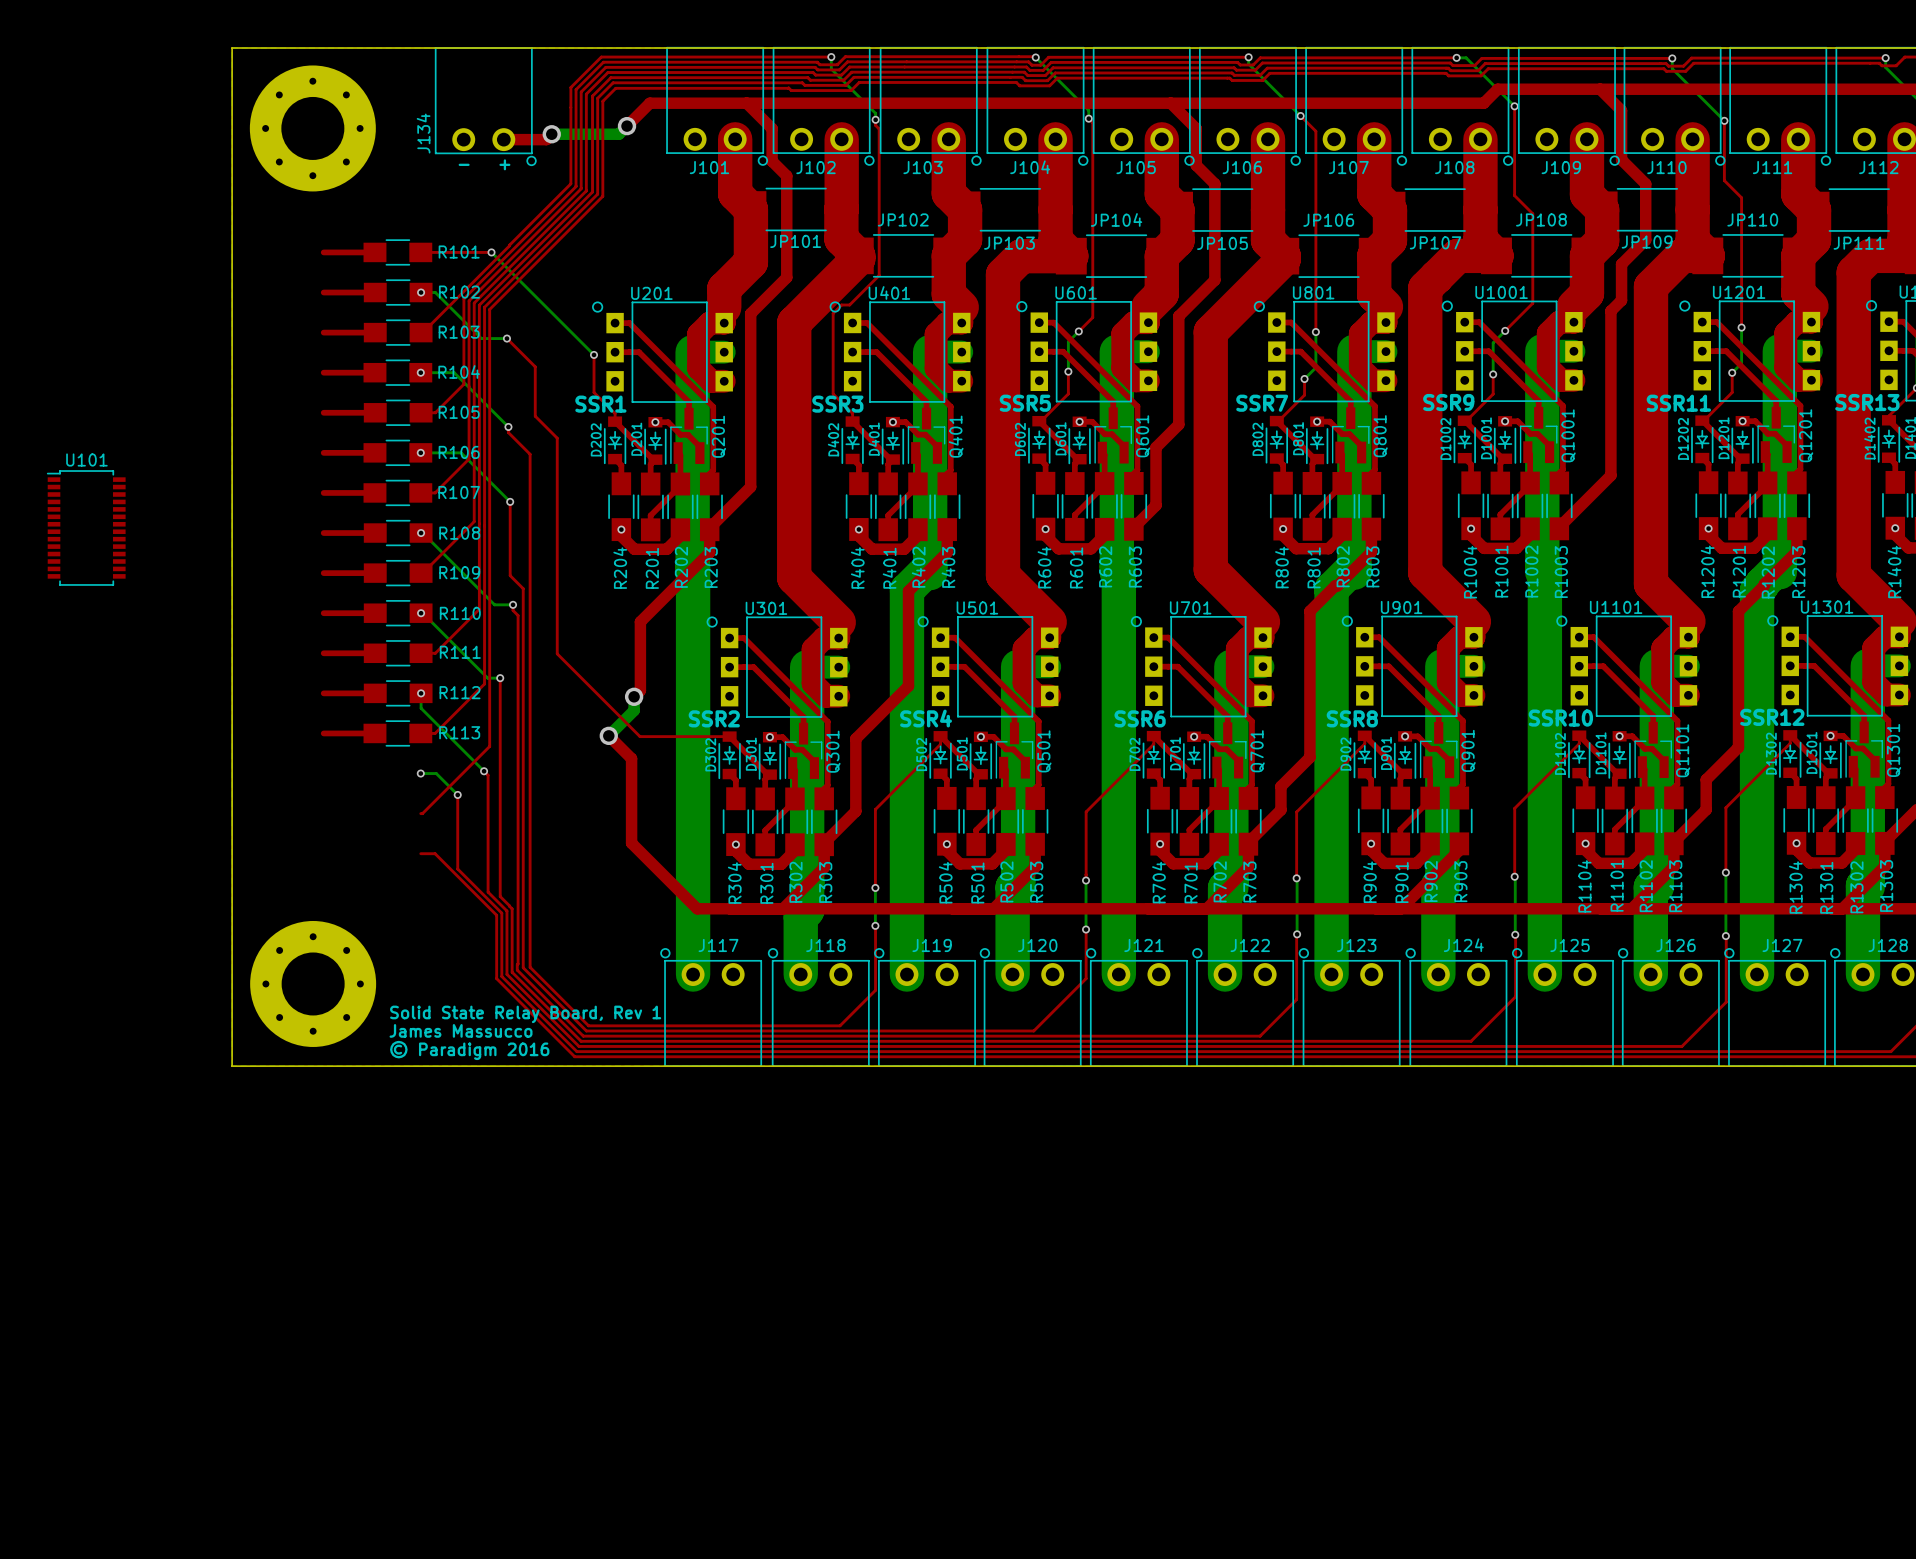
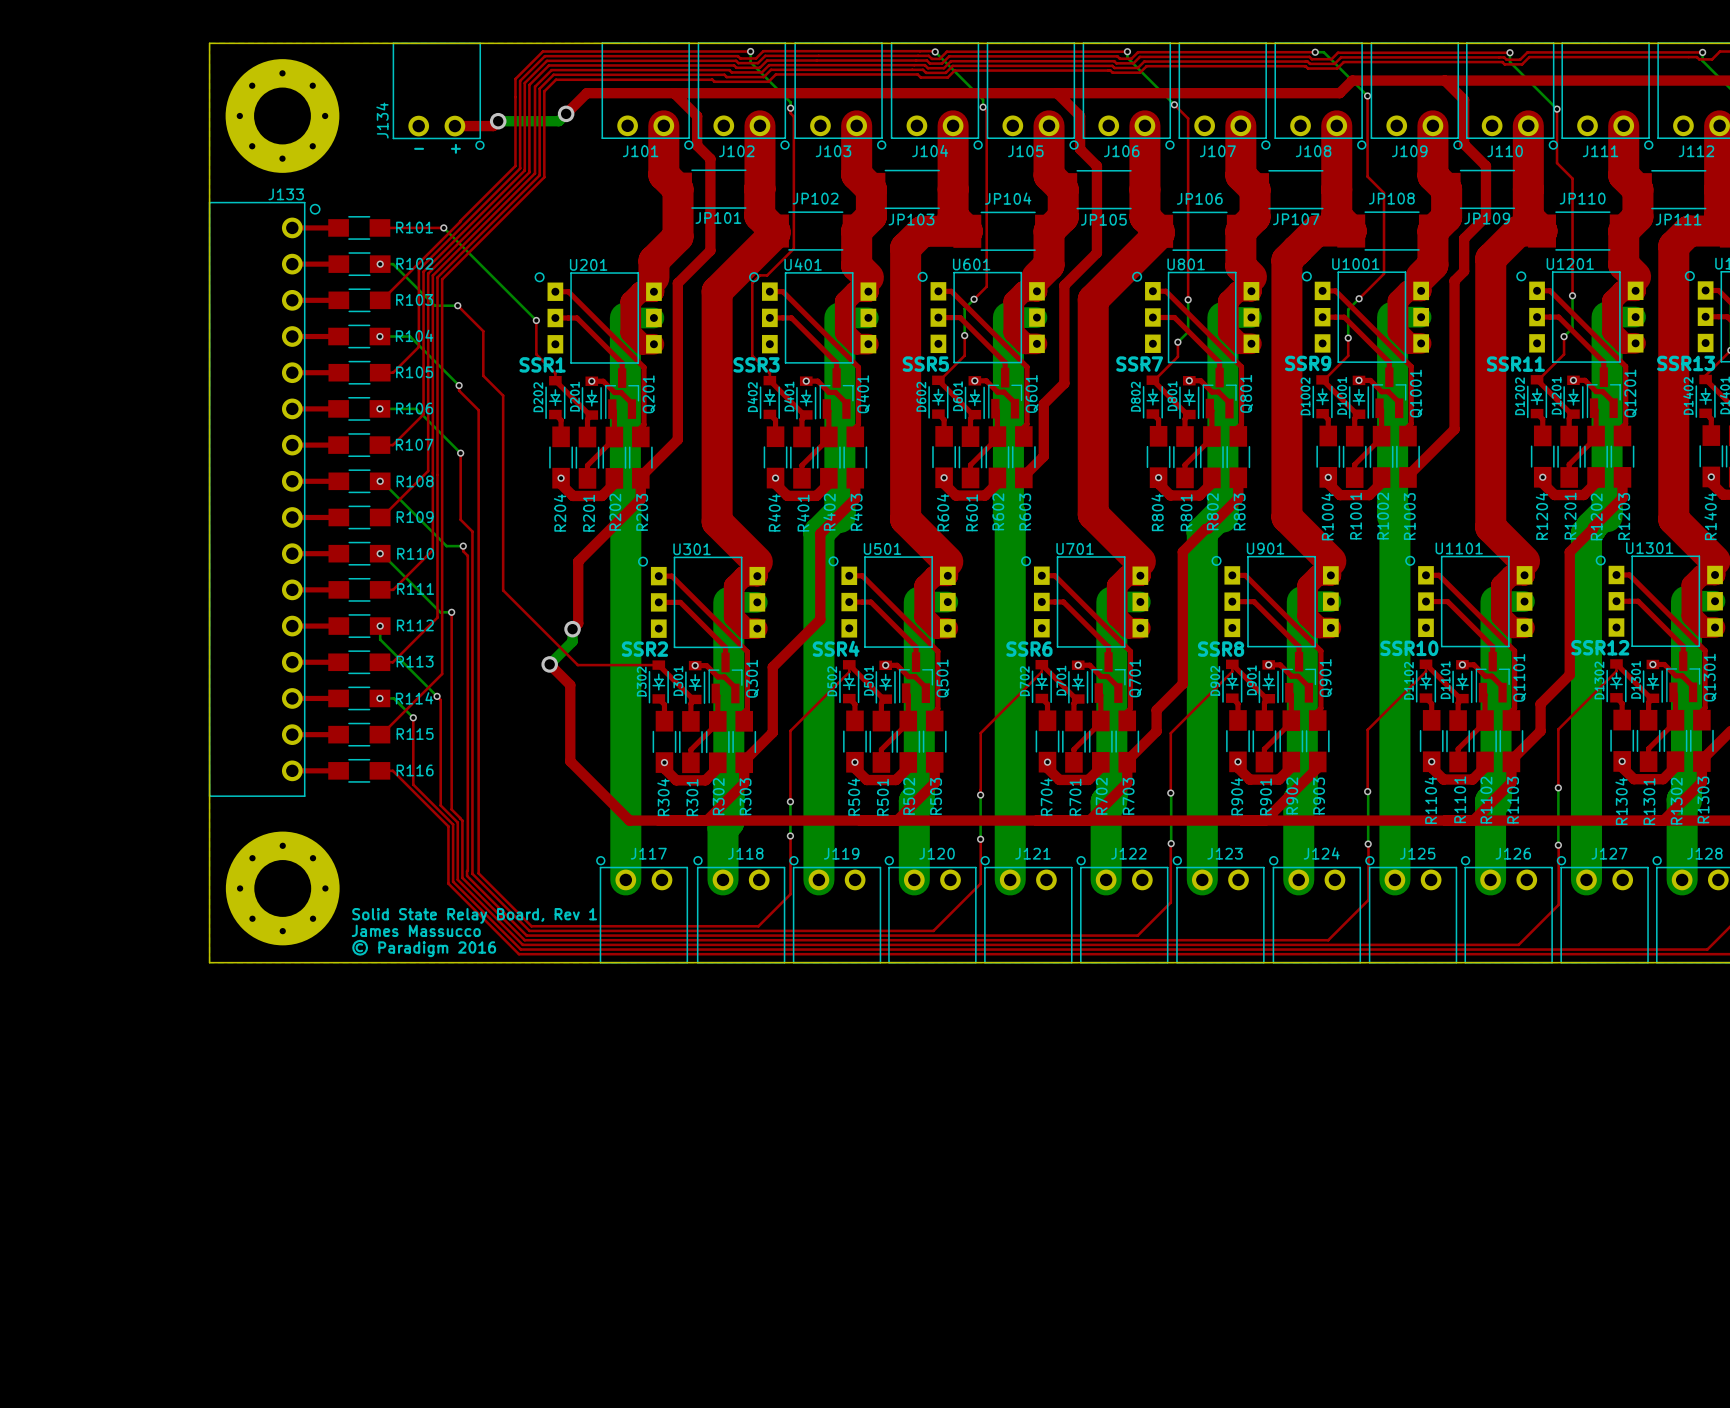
U101: (86, 527) -> none
J133: none -> (264, 499)
top track: none -> (292, 698) (338, 698)
R114: none -> (359, 698)
top track: none -> (292, 734) (338, 734)
R115: none -> (359, 734)
top track: none -> (292, 770) (338, 770)
R116: none -> (359, 770)

